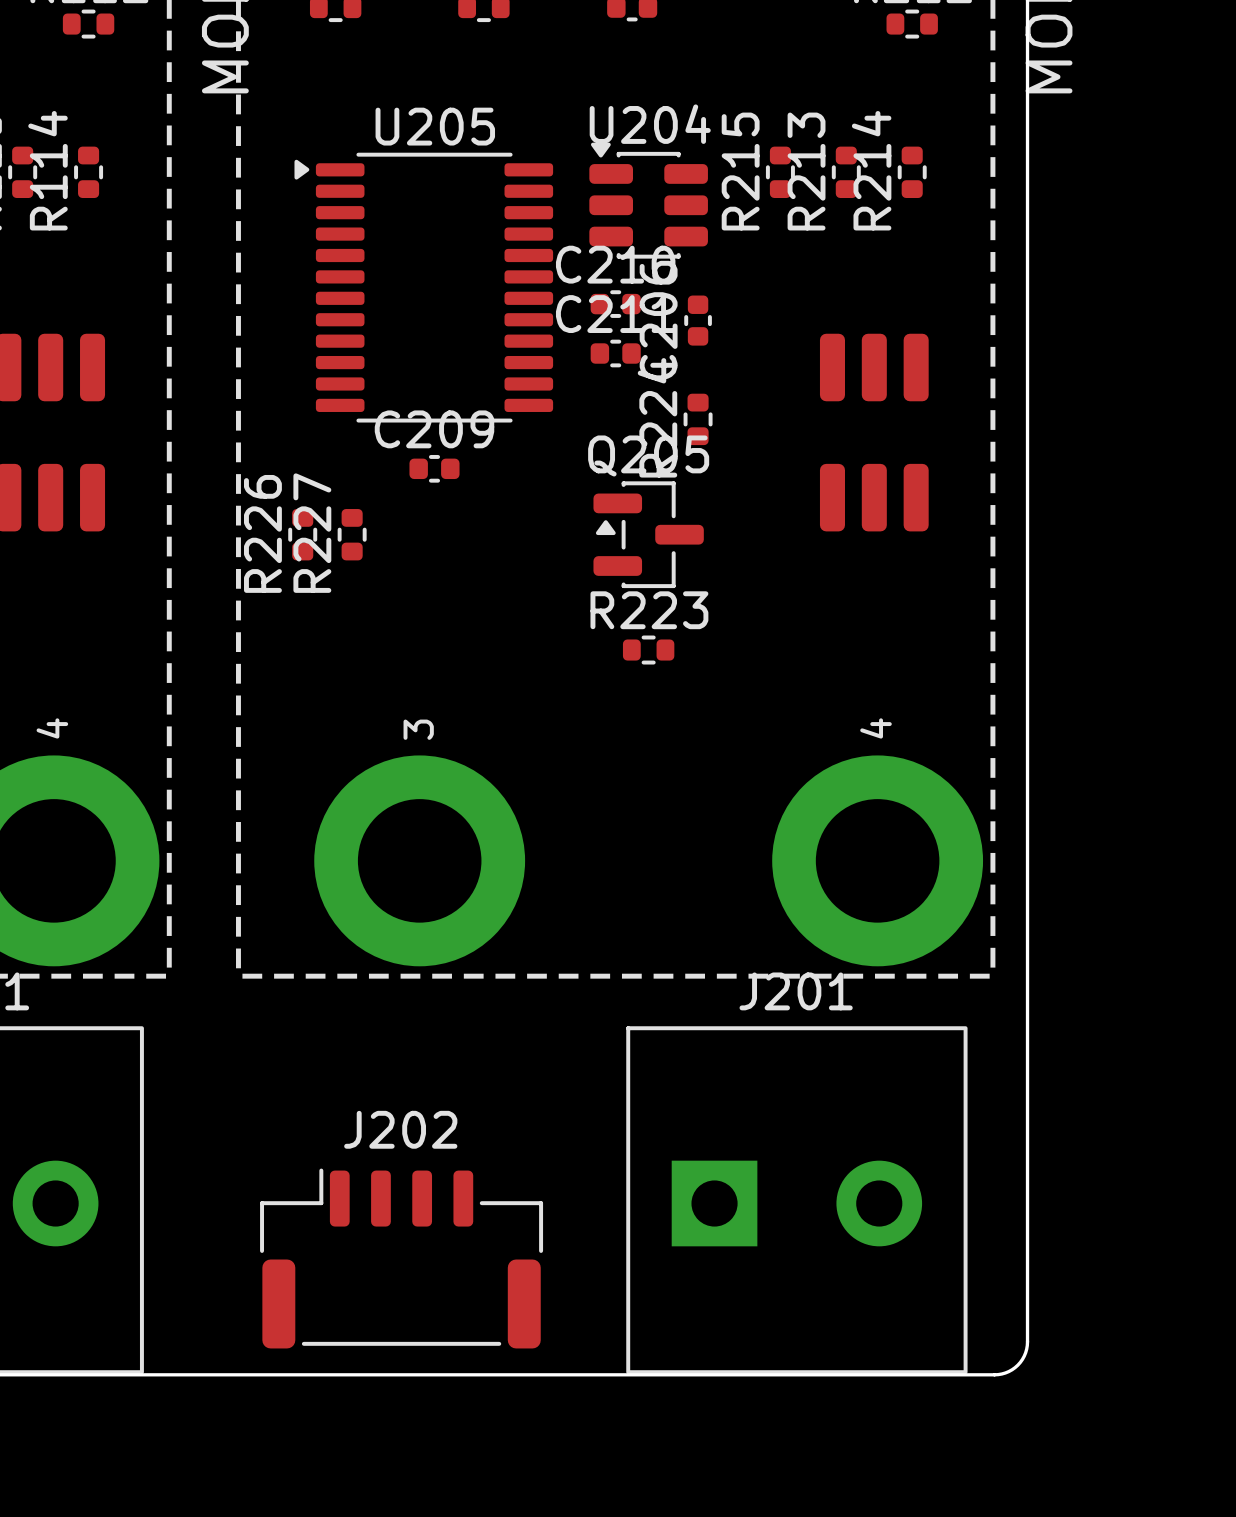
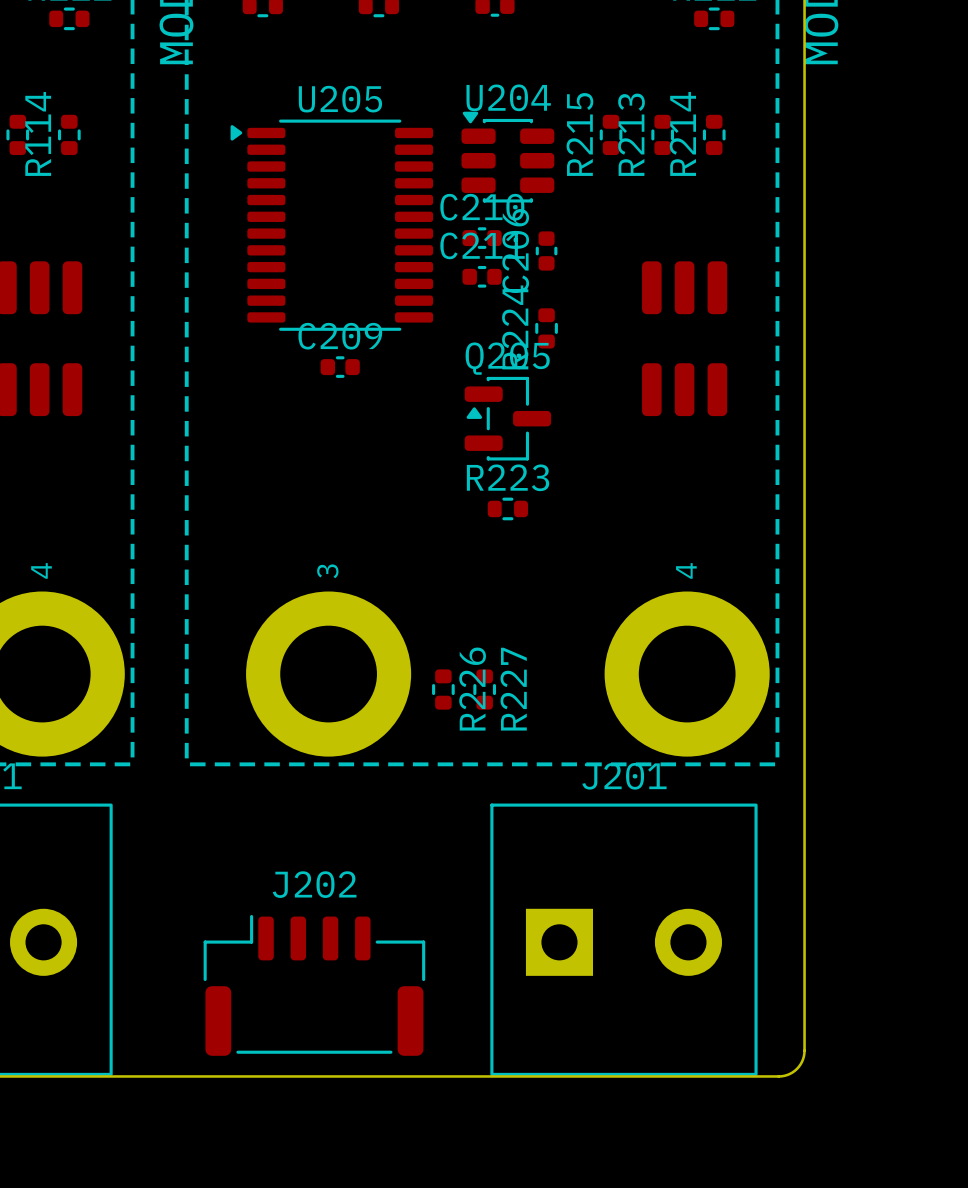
R226 name position: R226 (262, 533) -> R226 (472, 689)
R227 name position: R227 (312, 533) -> R227 (513, 689)
R226 position: (302, 534) -> (443, 689)
R227 position: (352, 534) -> (484, 689)

